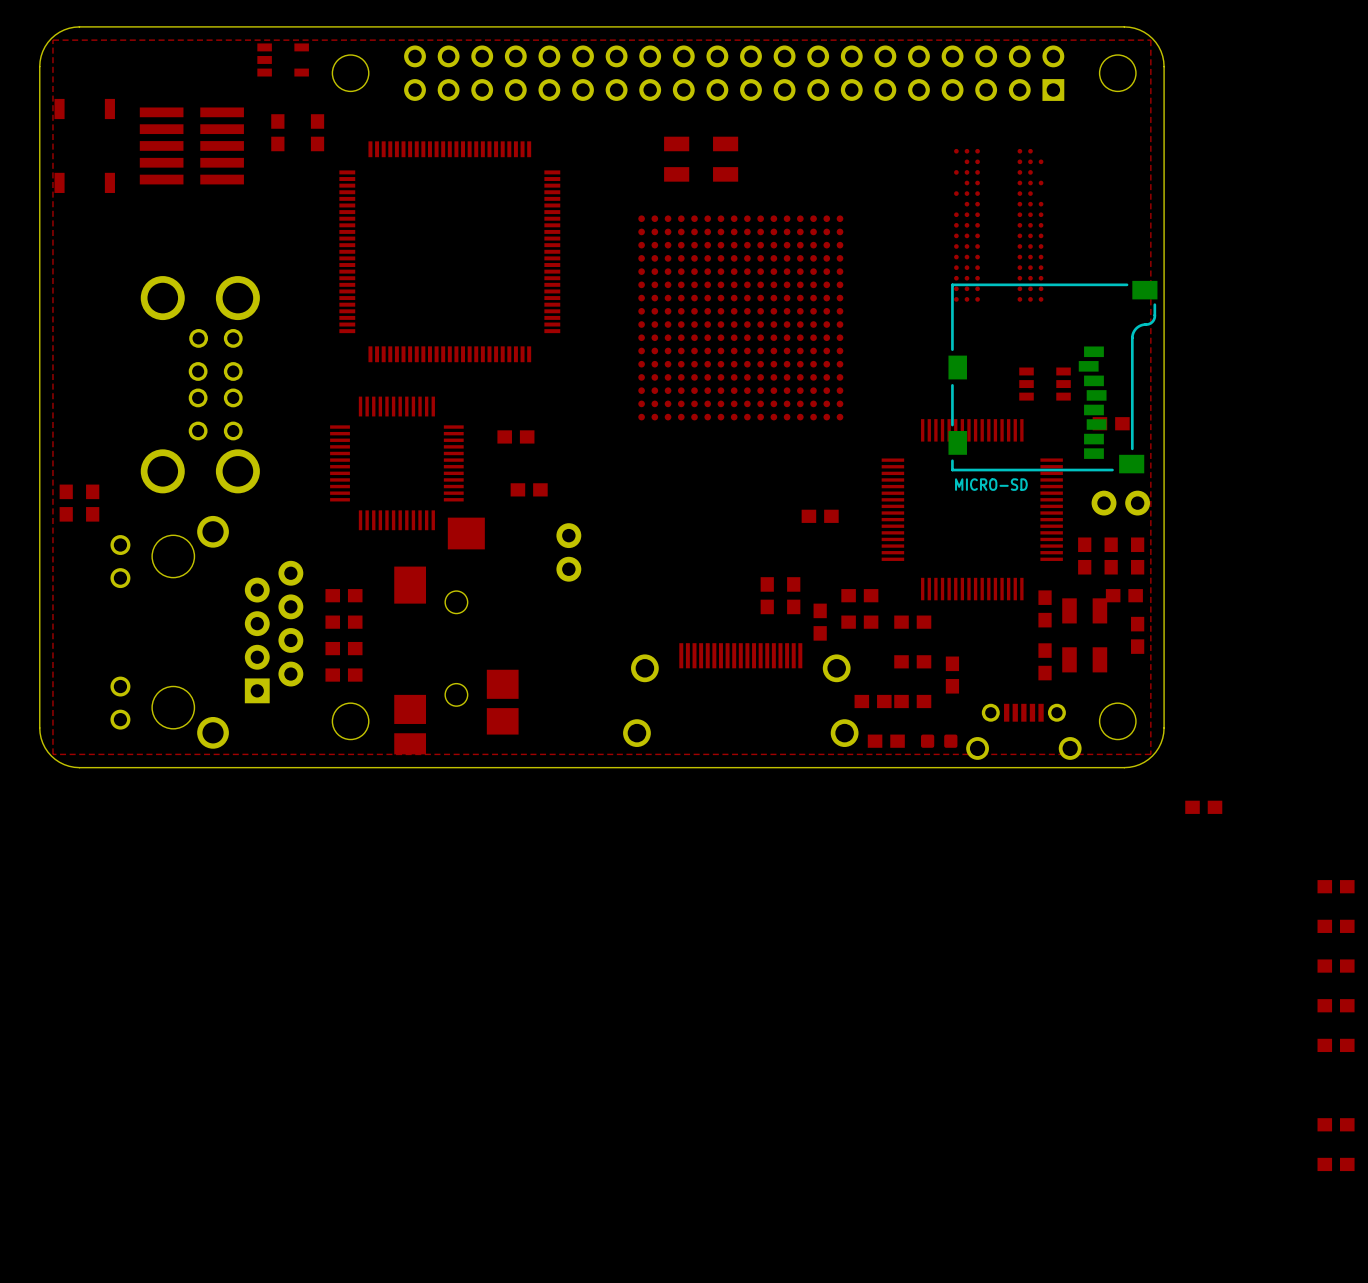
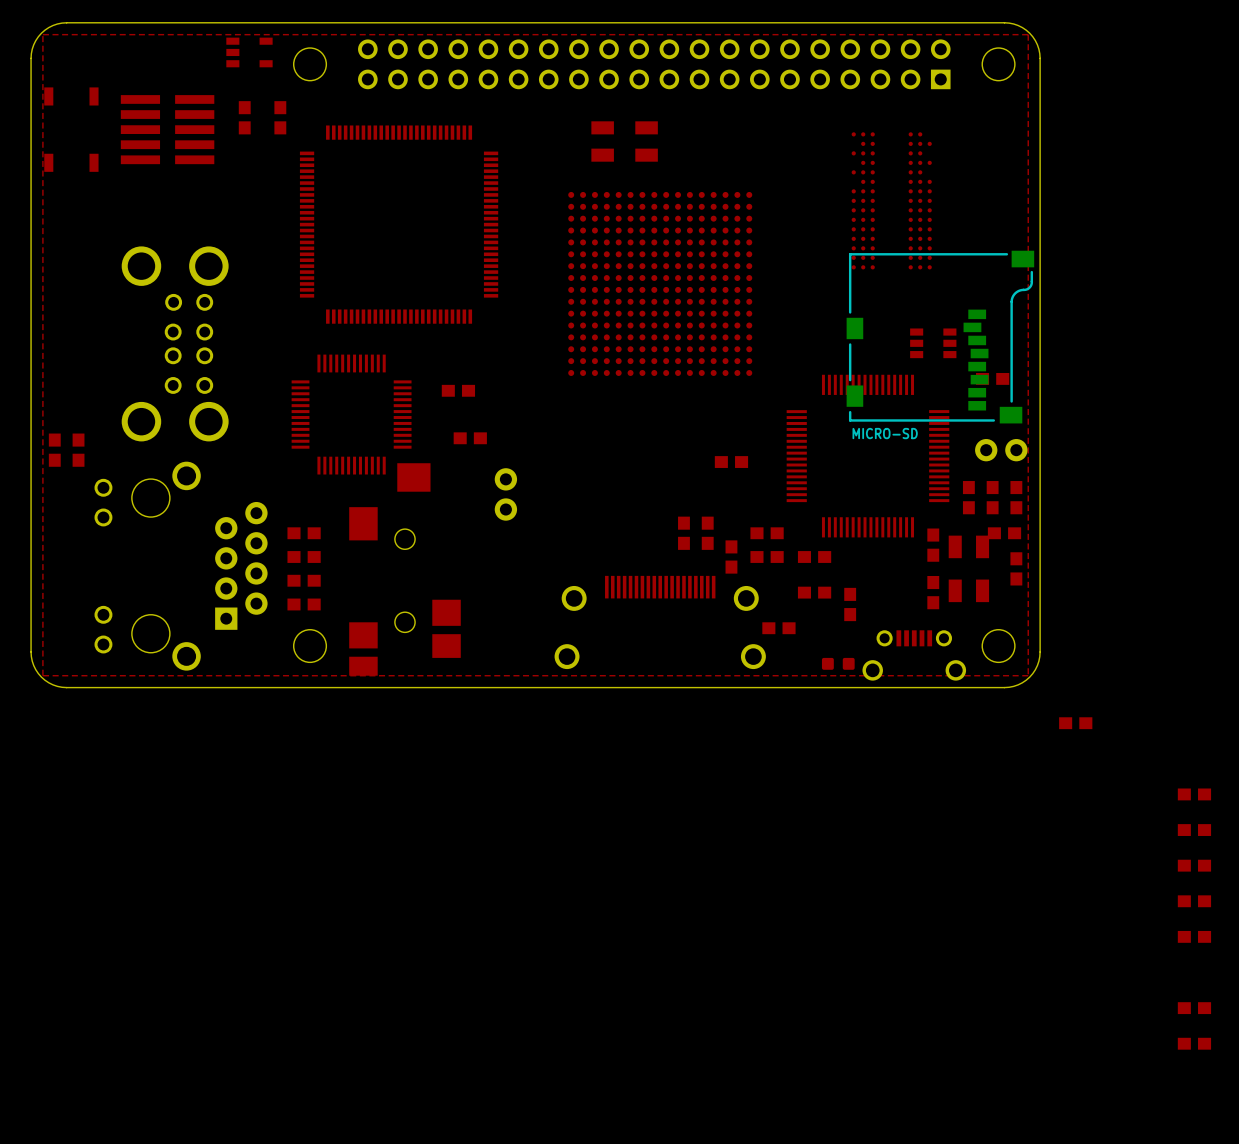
part: (912, 701) -> none
part: (886, 741) -> none

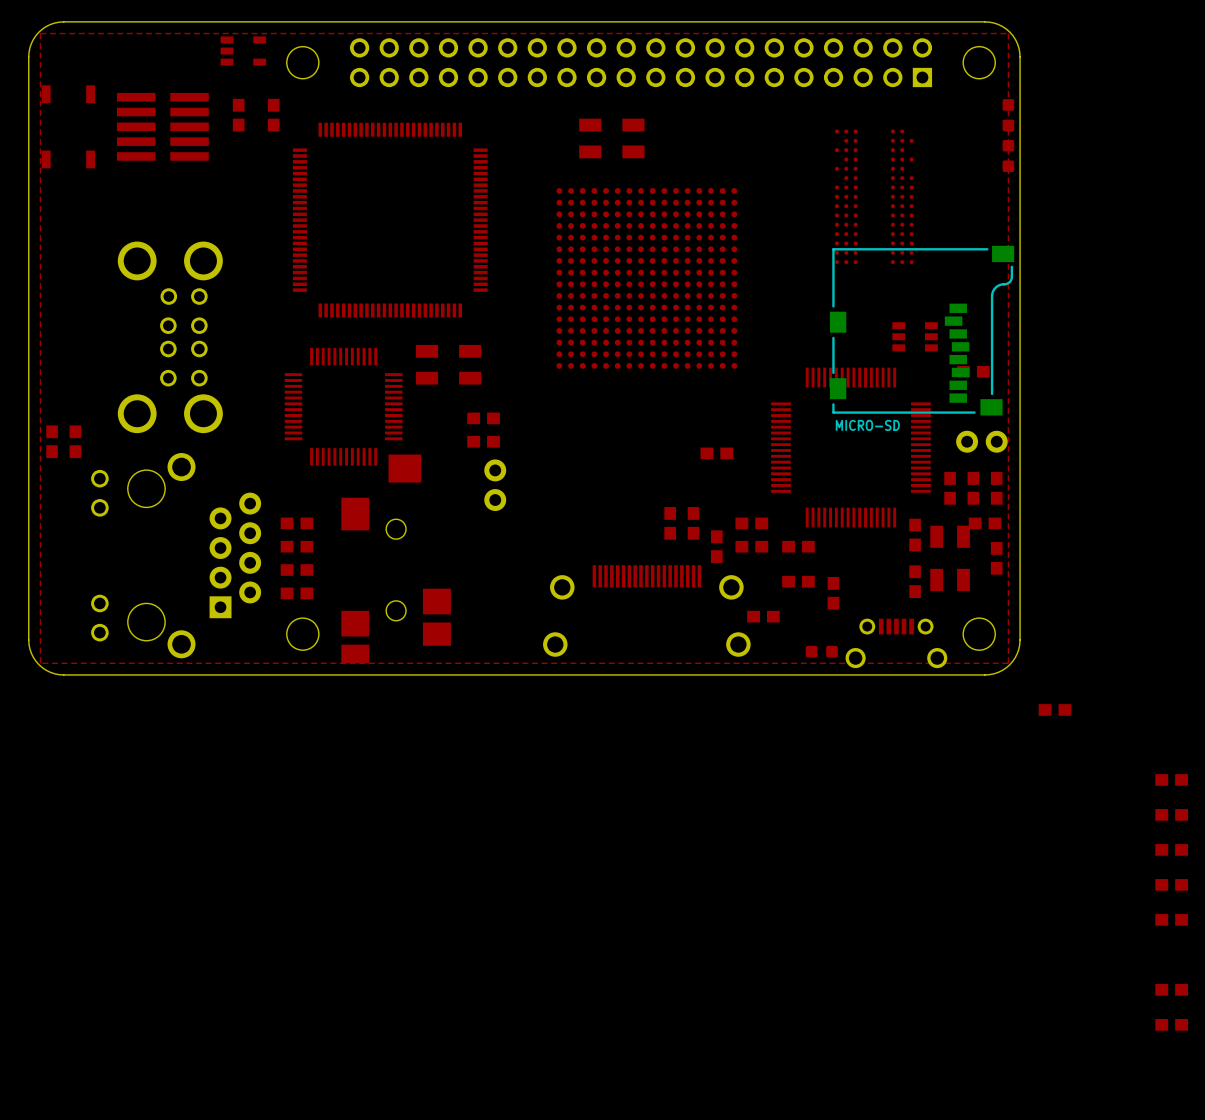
part: none -> (1008, 115)
part: none -> (1008, 155)
part: none -> (448, 364)
part: (458, 390) -> none
part: none -> (483, 418)
part: (470, 438) -> none
part: none -> (483, 441)

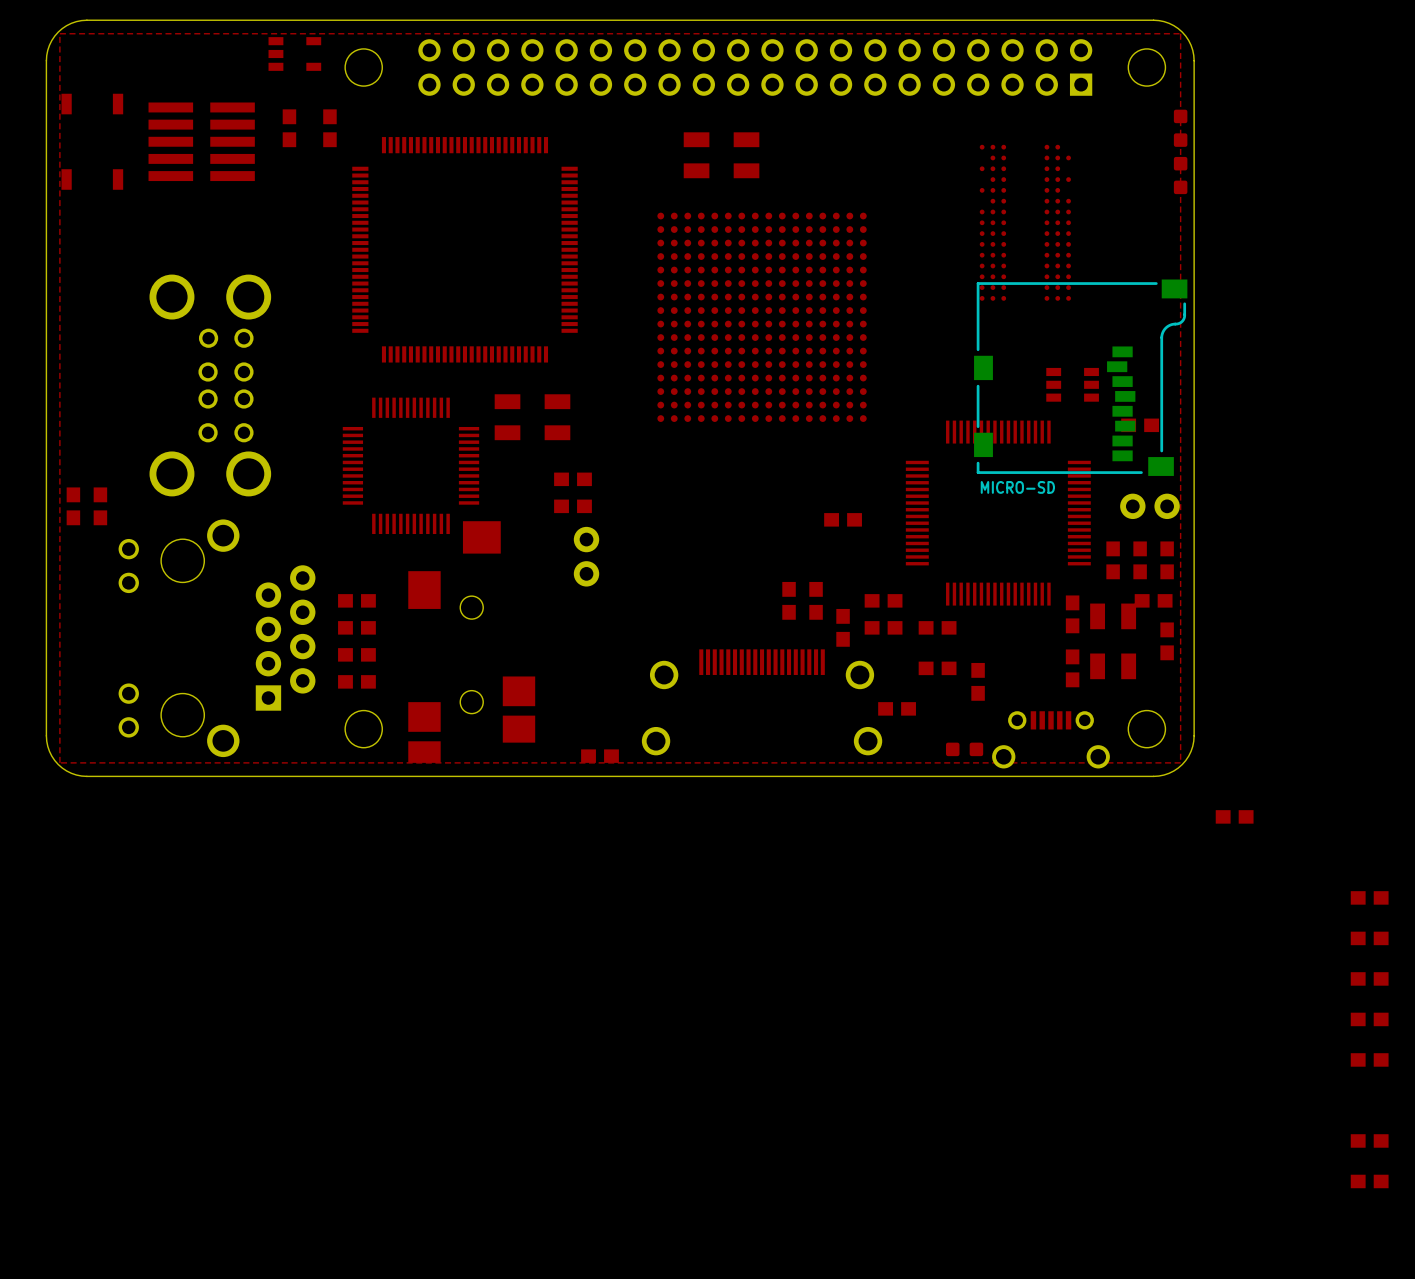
part: none -> (600, 756)

